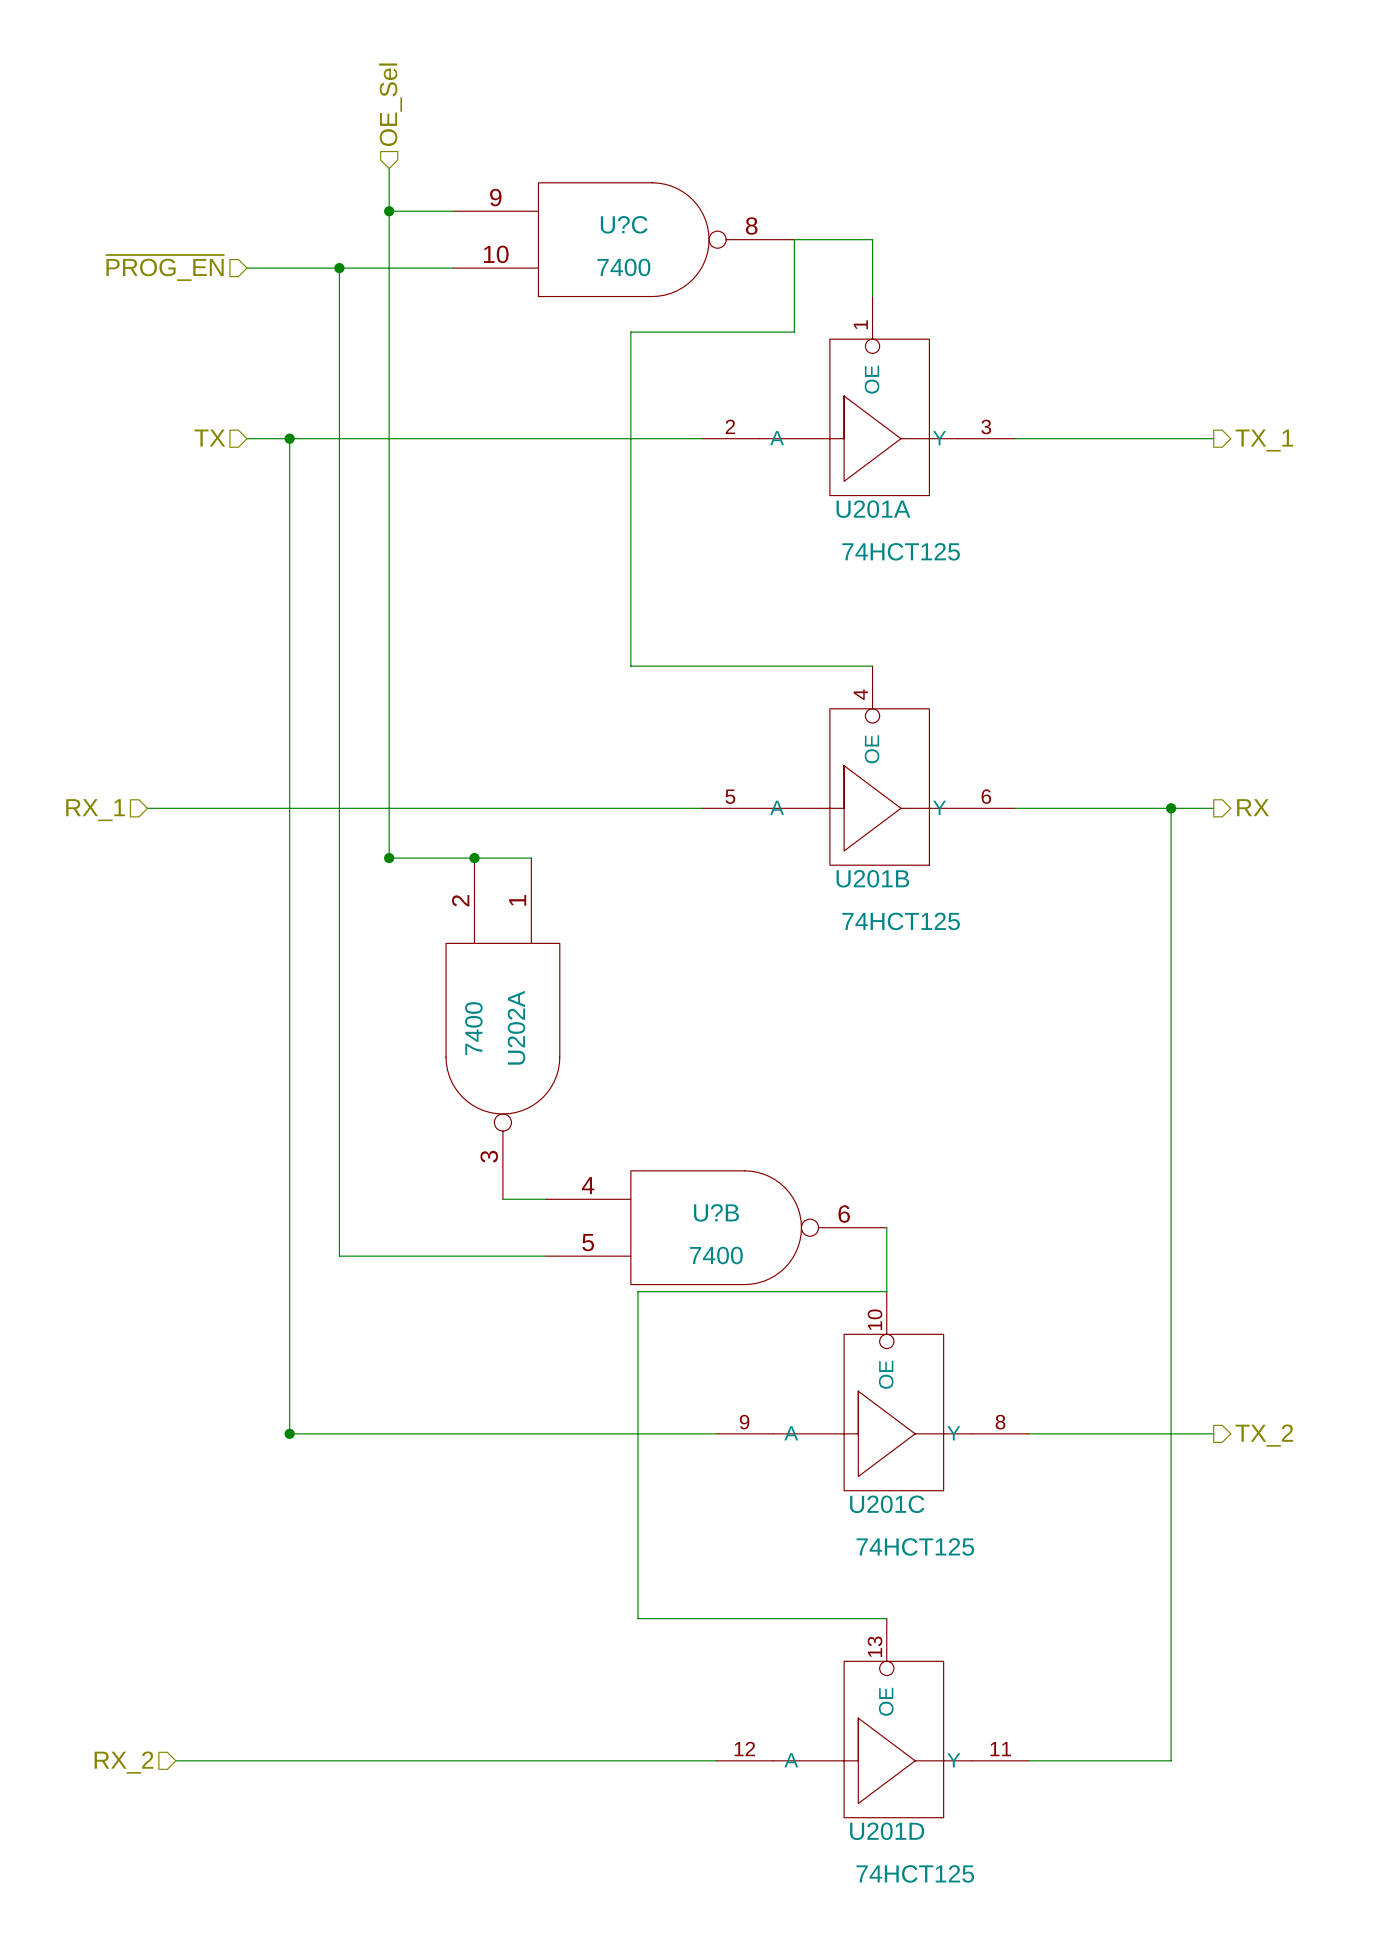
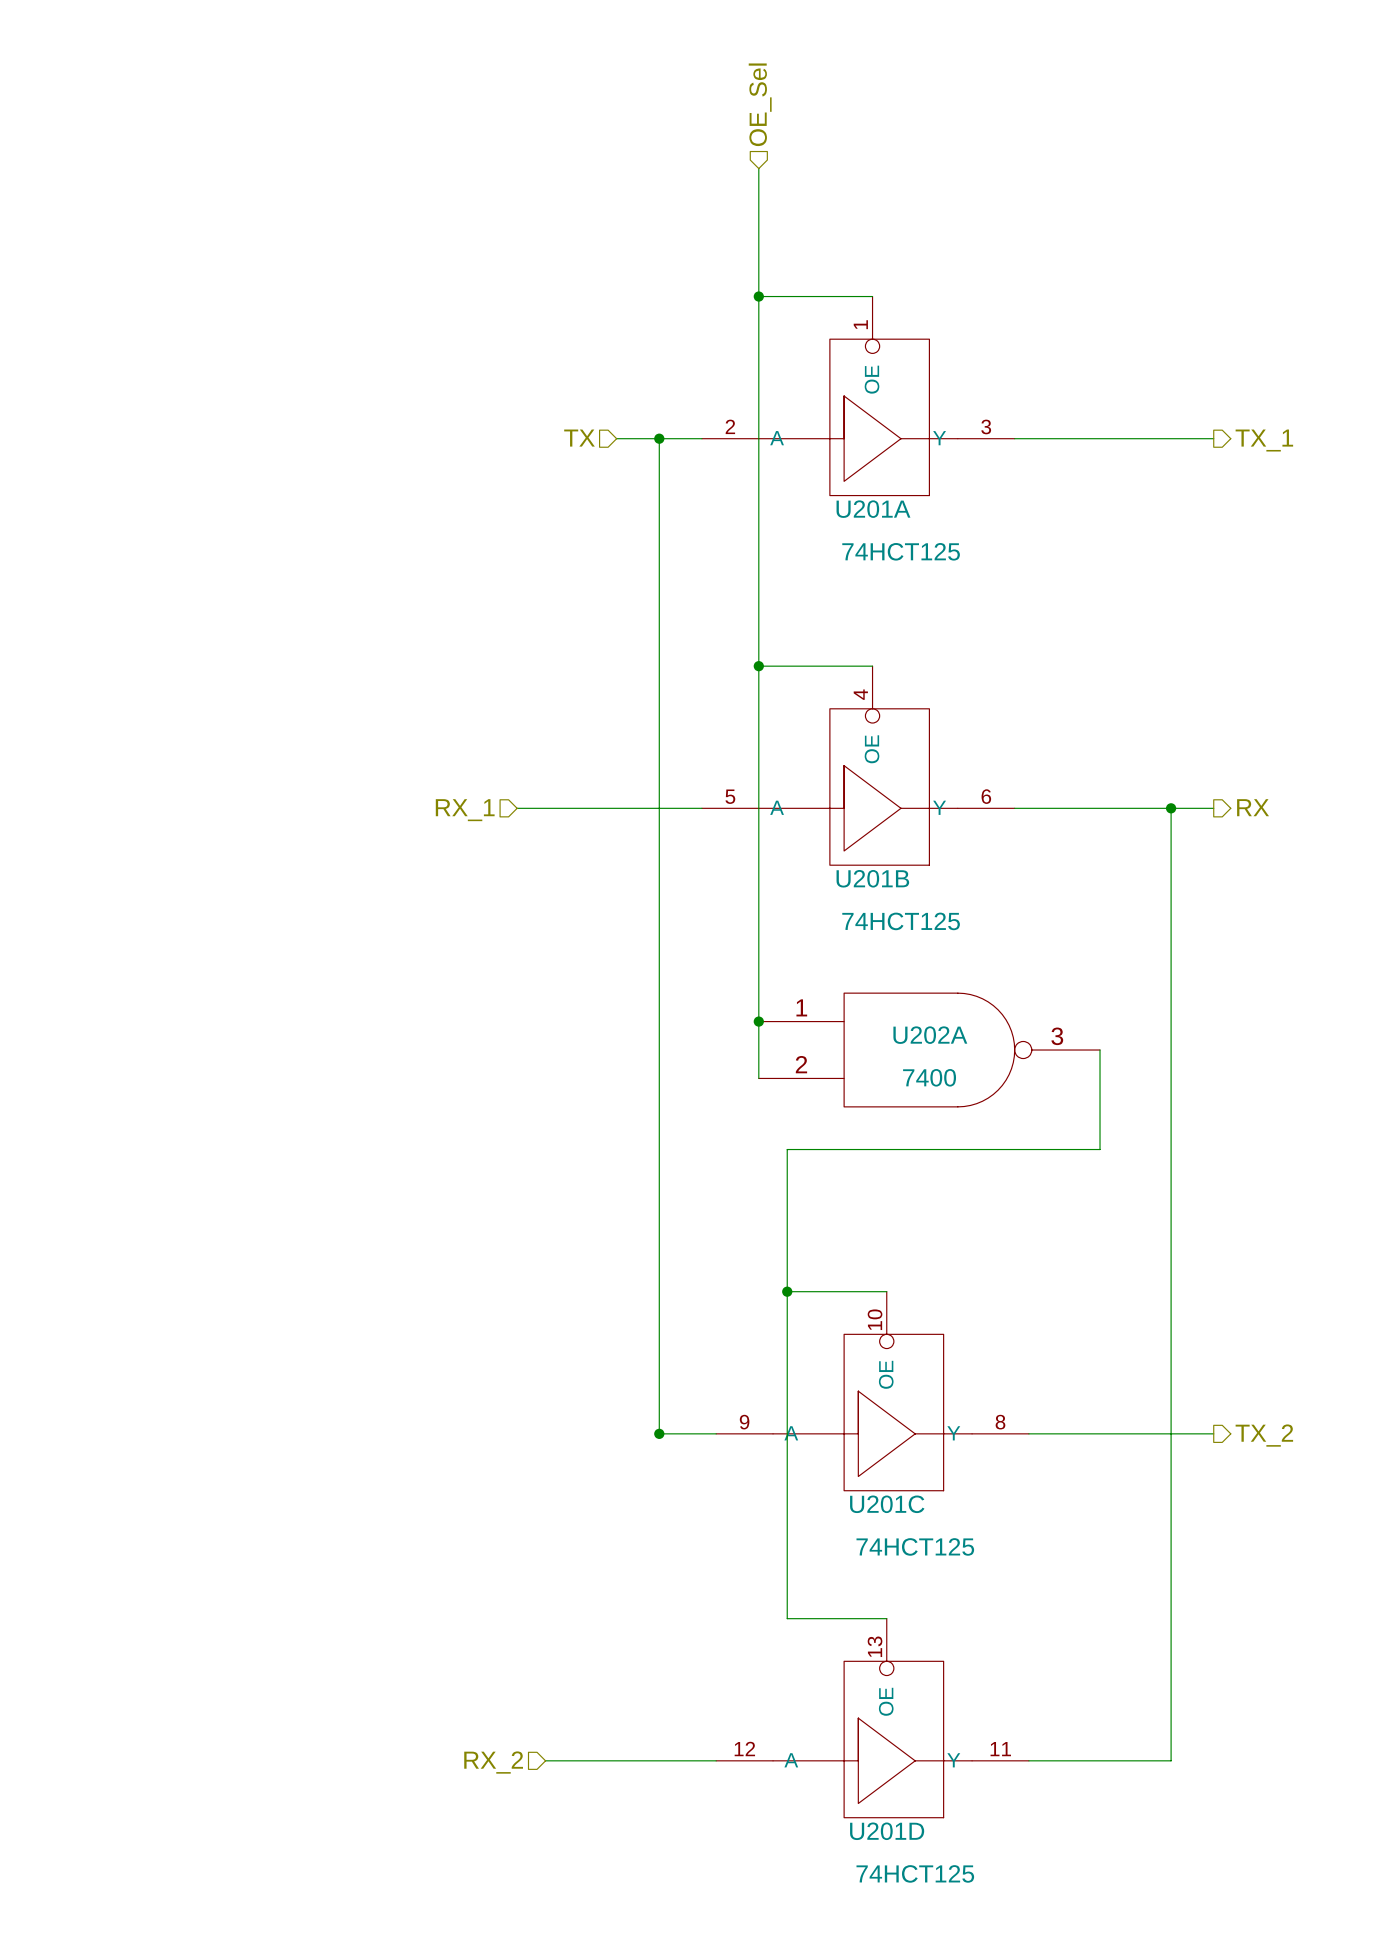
hierarchical label: OE_Sel (390, 104) -> none
hierarchical label: none -> OE_Sel (760, 104)
wire: (389, 168) (389, 858) (531, 858) -> none
wire: none -> (758, 168) (758, 1078)
wire: (389, 211) (453, 211) -> none
junction: (389, 211) -> none
U?C: 7400 (623, 239) -> none
hierarchical label: ~{PROG_EN} (165, 267) -> none
wire: (247, 268) (453, 268) -> none
wire: (339, 268) (339, 1256) (545, 1256) -> none
junction: (339, 268) -> none
junction: none -> (758, 296)
wire: (872, 296) (872, 239) (794, 239) (794, 332) (630, 332) (630, 666) (758, 666) -> (872, 296) (758, 296)
hierarchical label: TX (209, 438) -> none
wire: (247, 438) (616, 438) -> none
wire: (289, 438) (289, 1433) (659, 1433) -> (659, 438) (659, 1433)
junction: (289, 438) -> none
hierarchical label: none -> TX (579, 438)
junction: none -> (659, 438)
junction: none -> (758, 666)
wire: (147, 808) (517, 808) -> none
hierarchical label: RX_1 (95, 810) -> none
hierarchical label: none -> RX_1 (465, 810)
junction: (389, 858) -> none
junction: (474, 858) -> none
junction: none -> (758, 1021)
U202A rotation: 0° (502, 1028) -> 90° counterclockwise (929, 1050)
U202A position: (502, 1028) -> (929, 1050)
wire: (502, 1199) (545, 1199) -> none
U?B: 7400 (716, 1227) -> none
wire: (886, 1227) (886, 1291) -> none
wire: (787, 1291) (637, 1291) (637, 1618) (787, 1618) -> (1100, 1050) (1100, 1149) (787, 1149) (787, 1618)
junction: none -> (787, 1291)
junction: (289, 1433) -> none
junction: none -> (659, 1433)
wire: (175, 1760) (545, 1760) -> none
hierarchical label: RX_2 (123, 1762) -> none
hierarchical label: none -> RX_2 (493, 1762)

